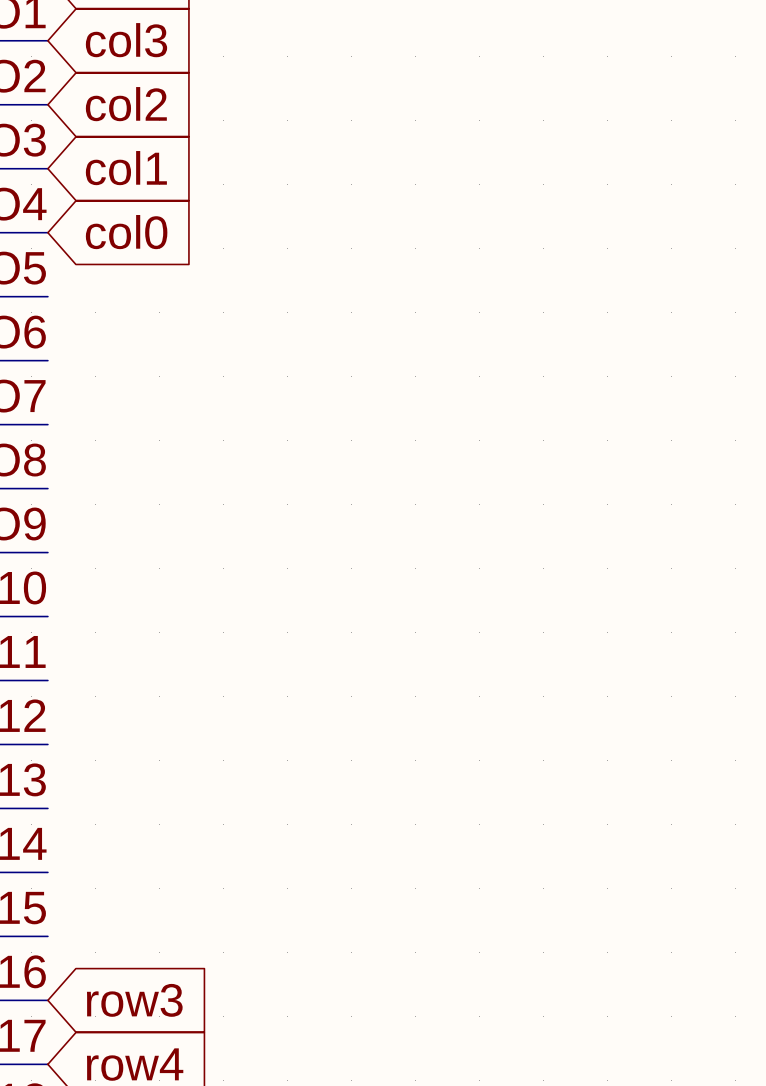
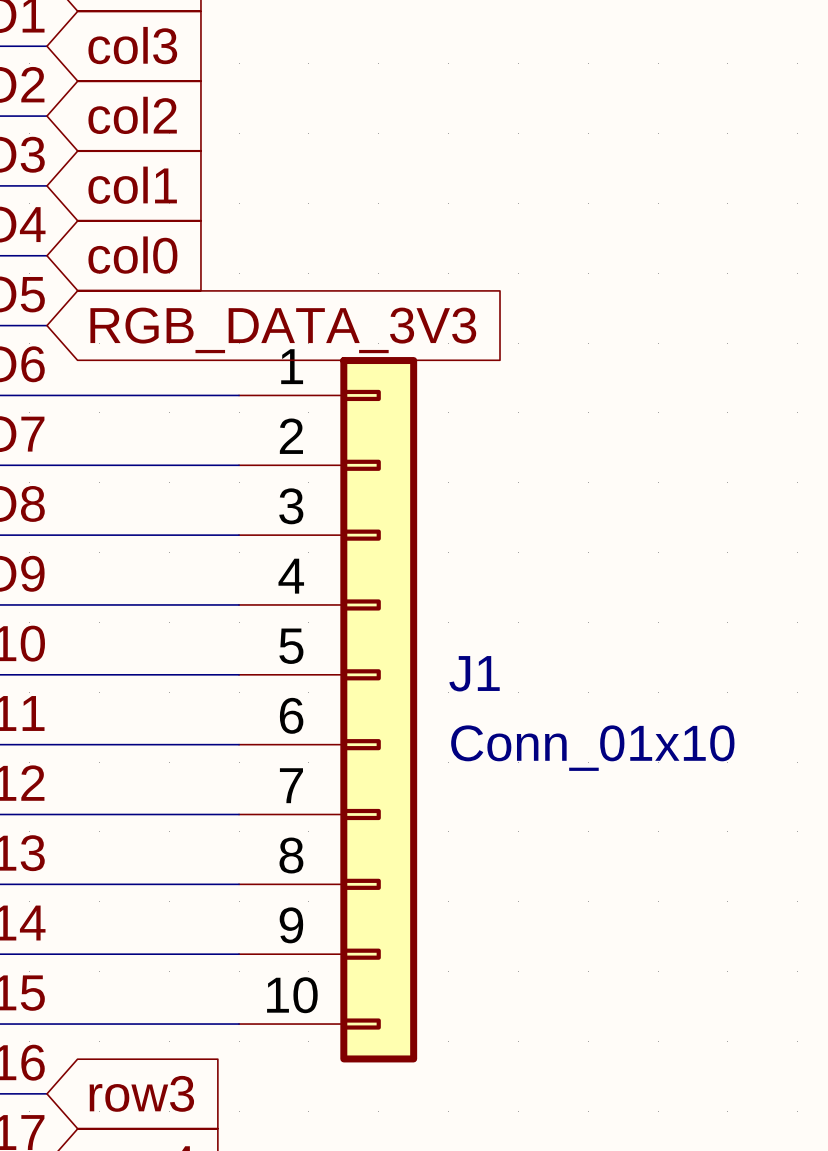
global label: none -> RGB_DATA_3V3 (283, 330)
wire: none -> (46, 395) (239, 395)
wire: none -> (46, 465) (239, 465)
wire: none -> (46, 535) (239, 535)
wire: none -> (46, 604) (239, 604)
wire: none -> (46, 674) (239, 674)
J1: none -> Conn_01x10 (328, 709)
wire: none -> (46, 744) (239, 744)
wire: none -> (46, 814) (239, 814)
wire: none -> (46, 884) (239, 884)
wire: none -> (46, 954) (239, 954)
wire: none -> (46, 1024) (239, 1024)

